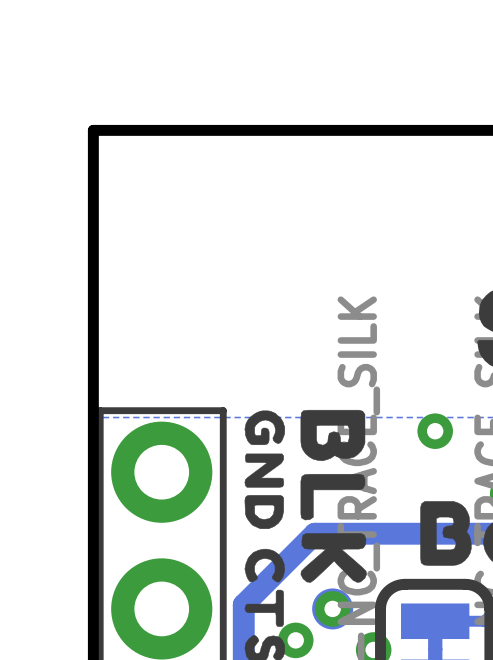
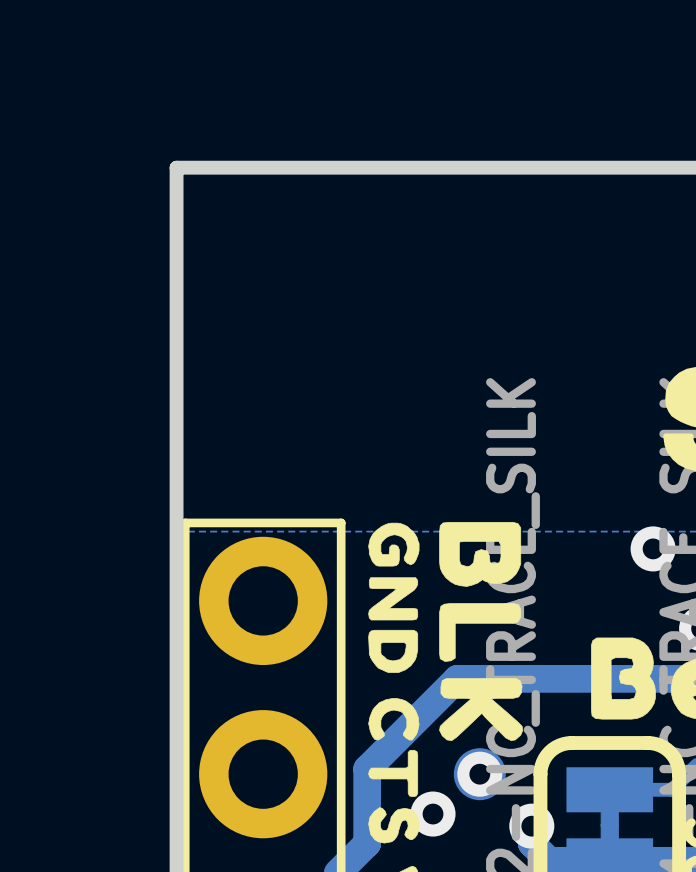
via position: (435, 431) -> (653, 548)

